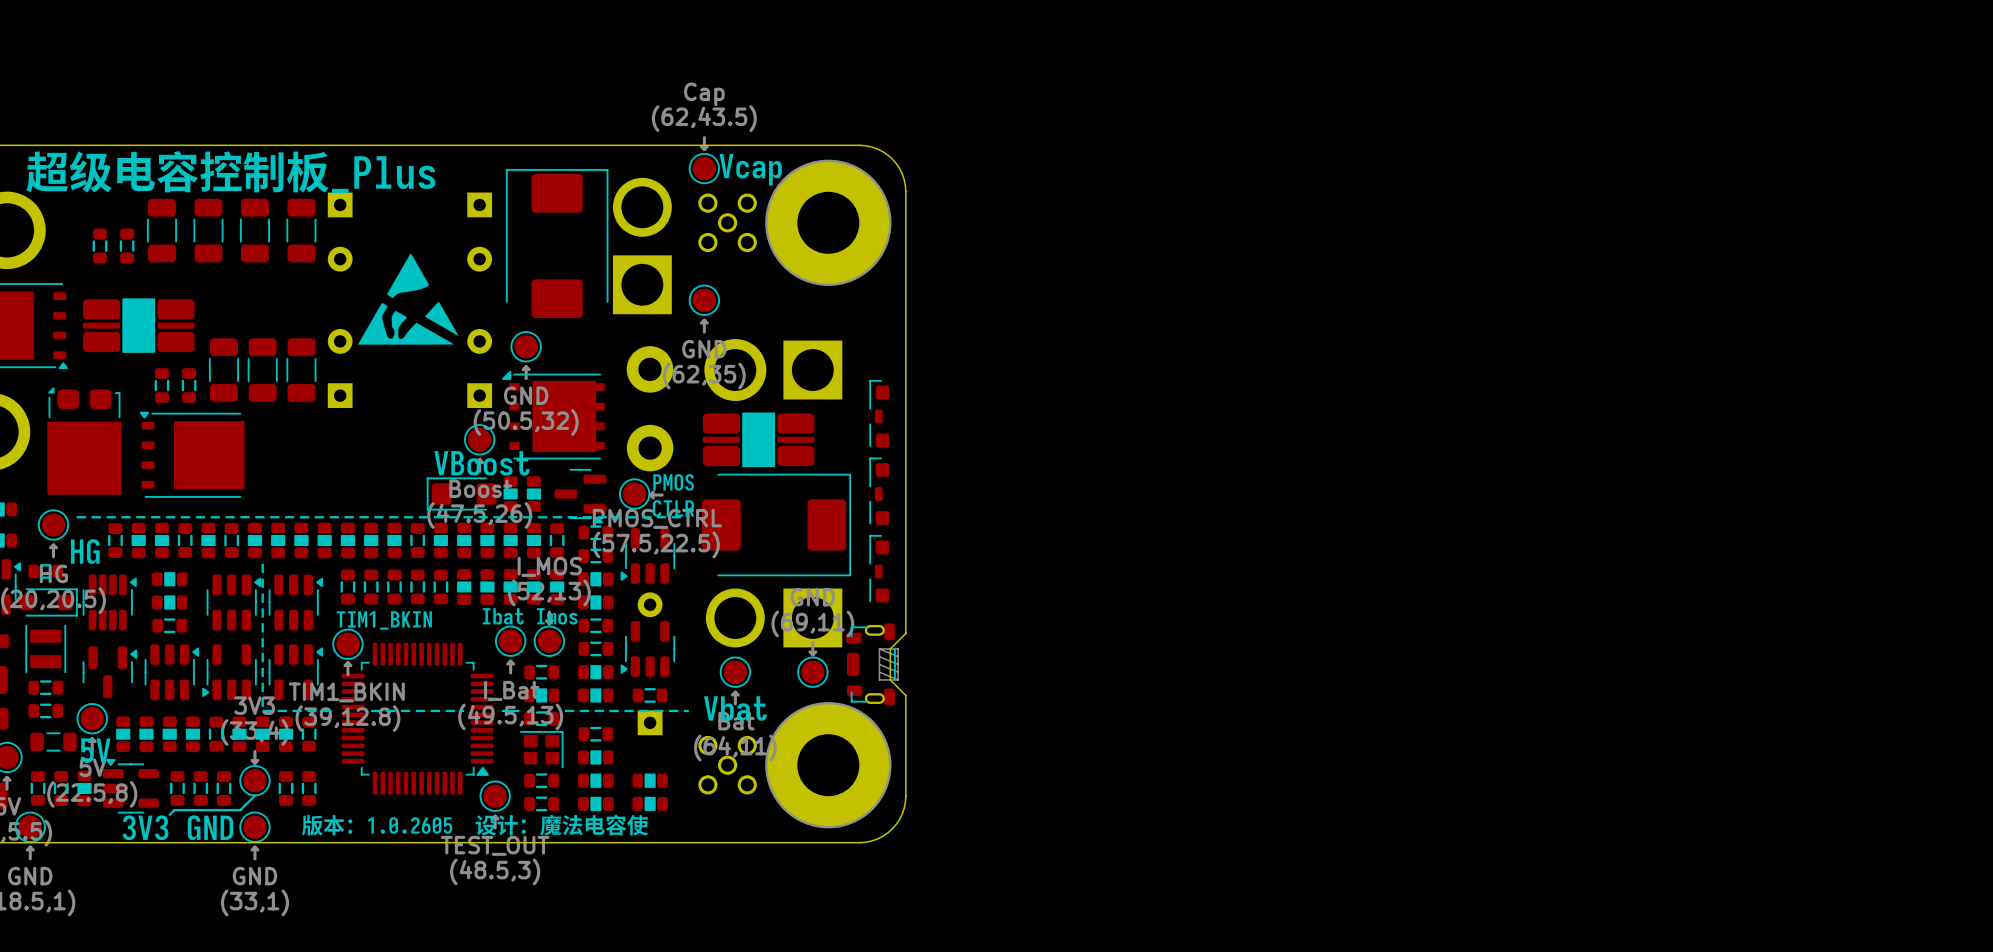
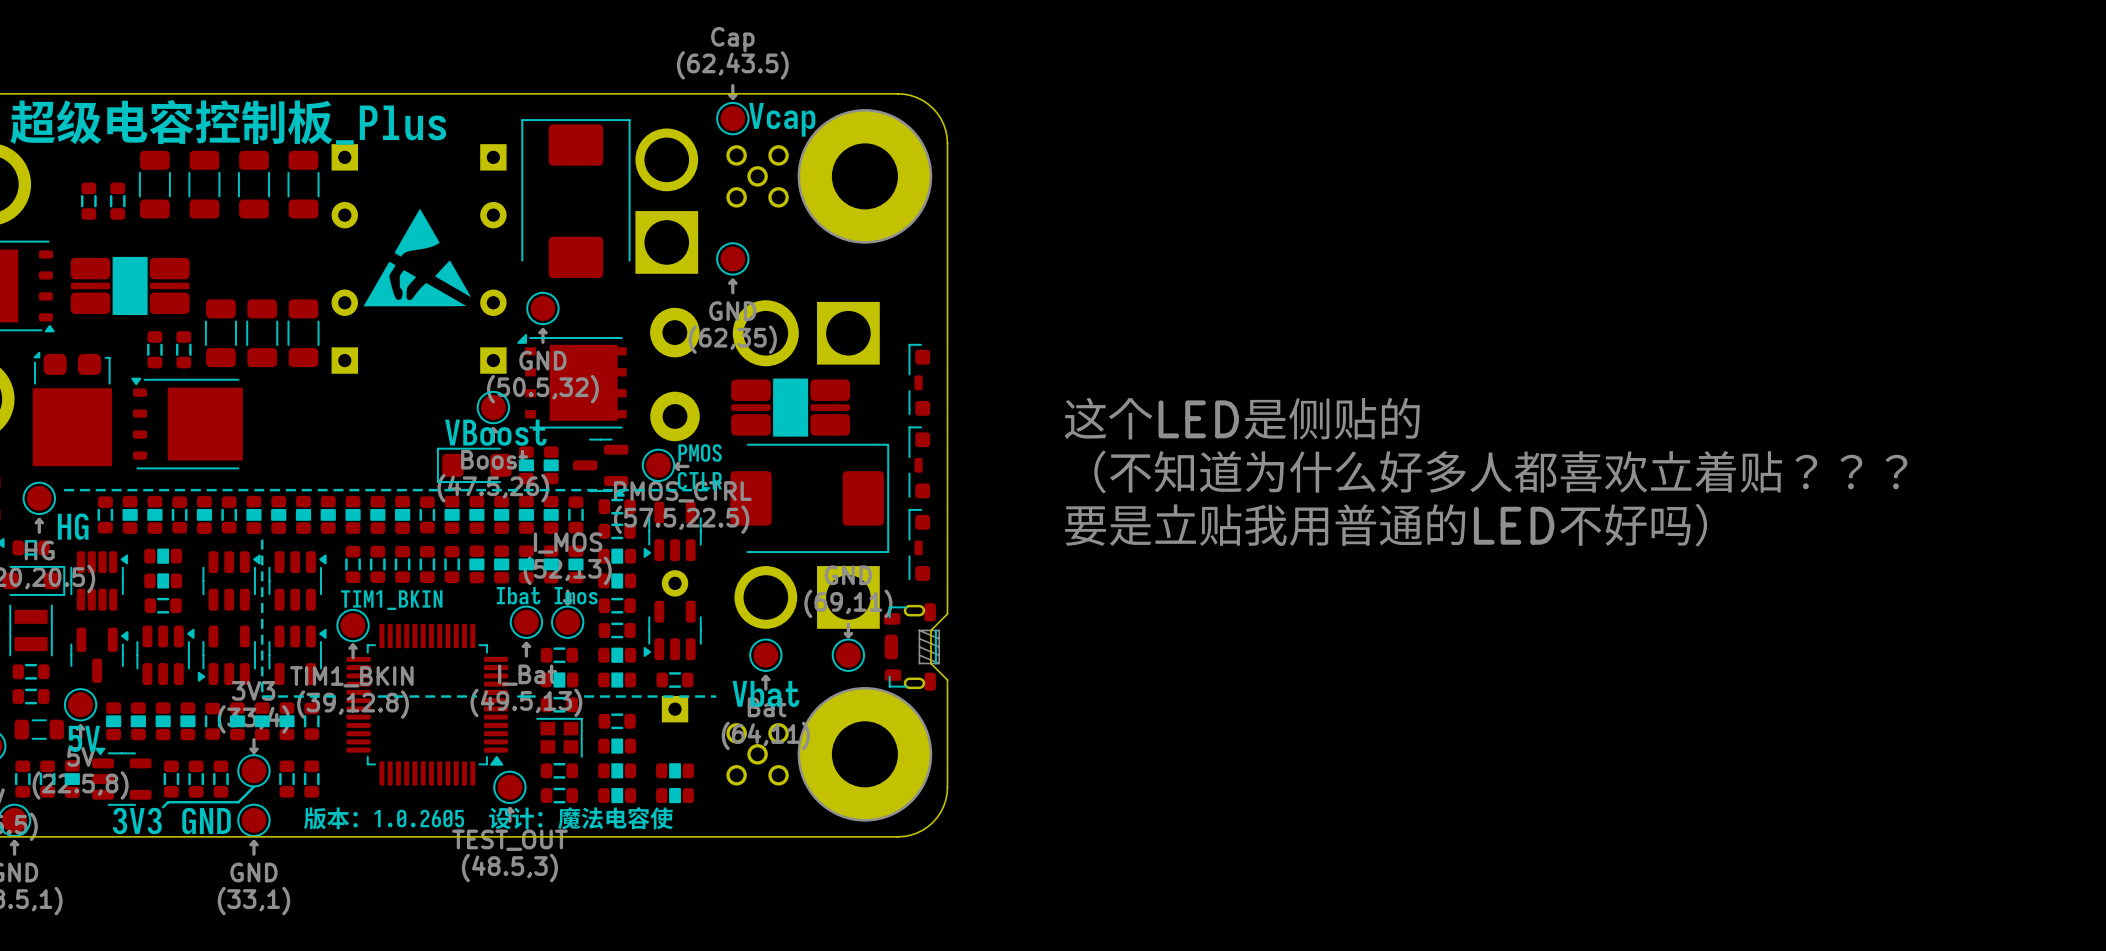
text: none -> 这个LED是侧贴的 (1242, 418)
text: none -> （不知道为什么好多人都喜欢立着贴？？？ (1500, 471)
text: none -> 要是立贴我用普通的LED不好吗） (1386, 525)

